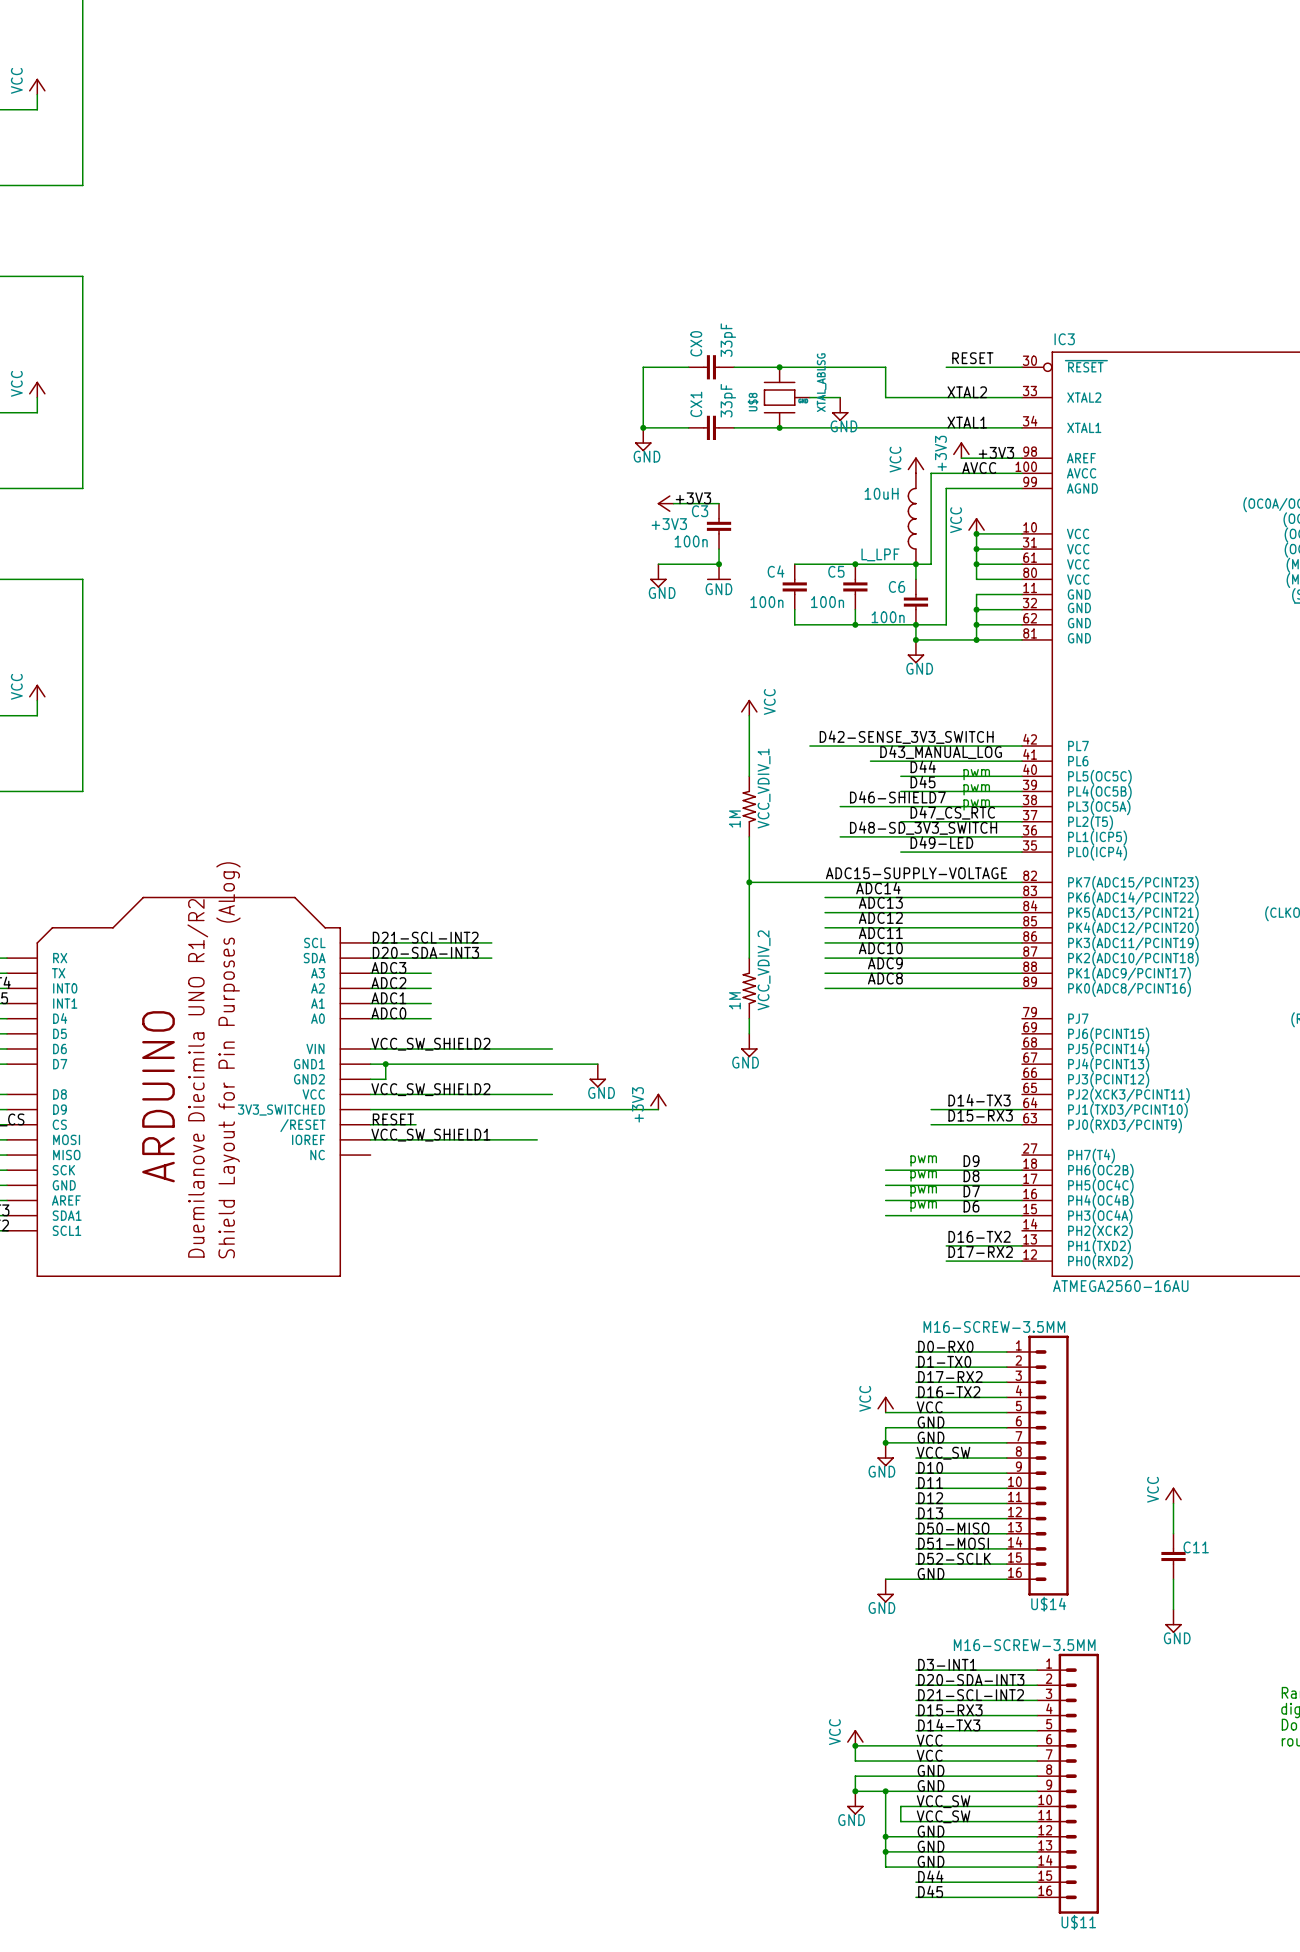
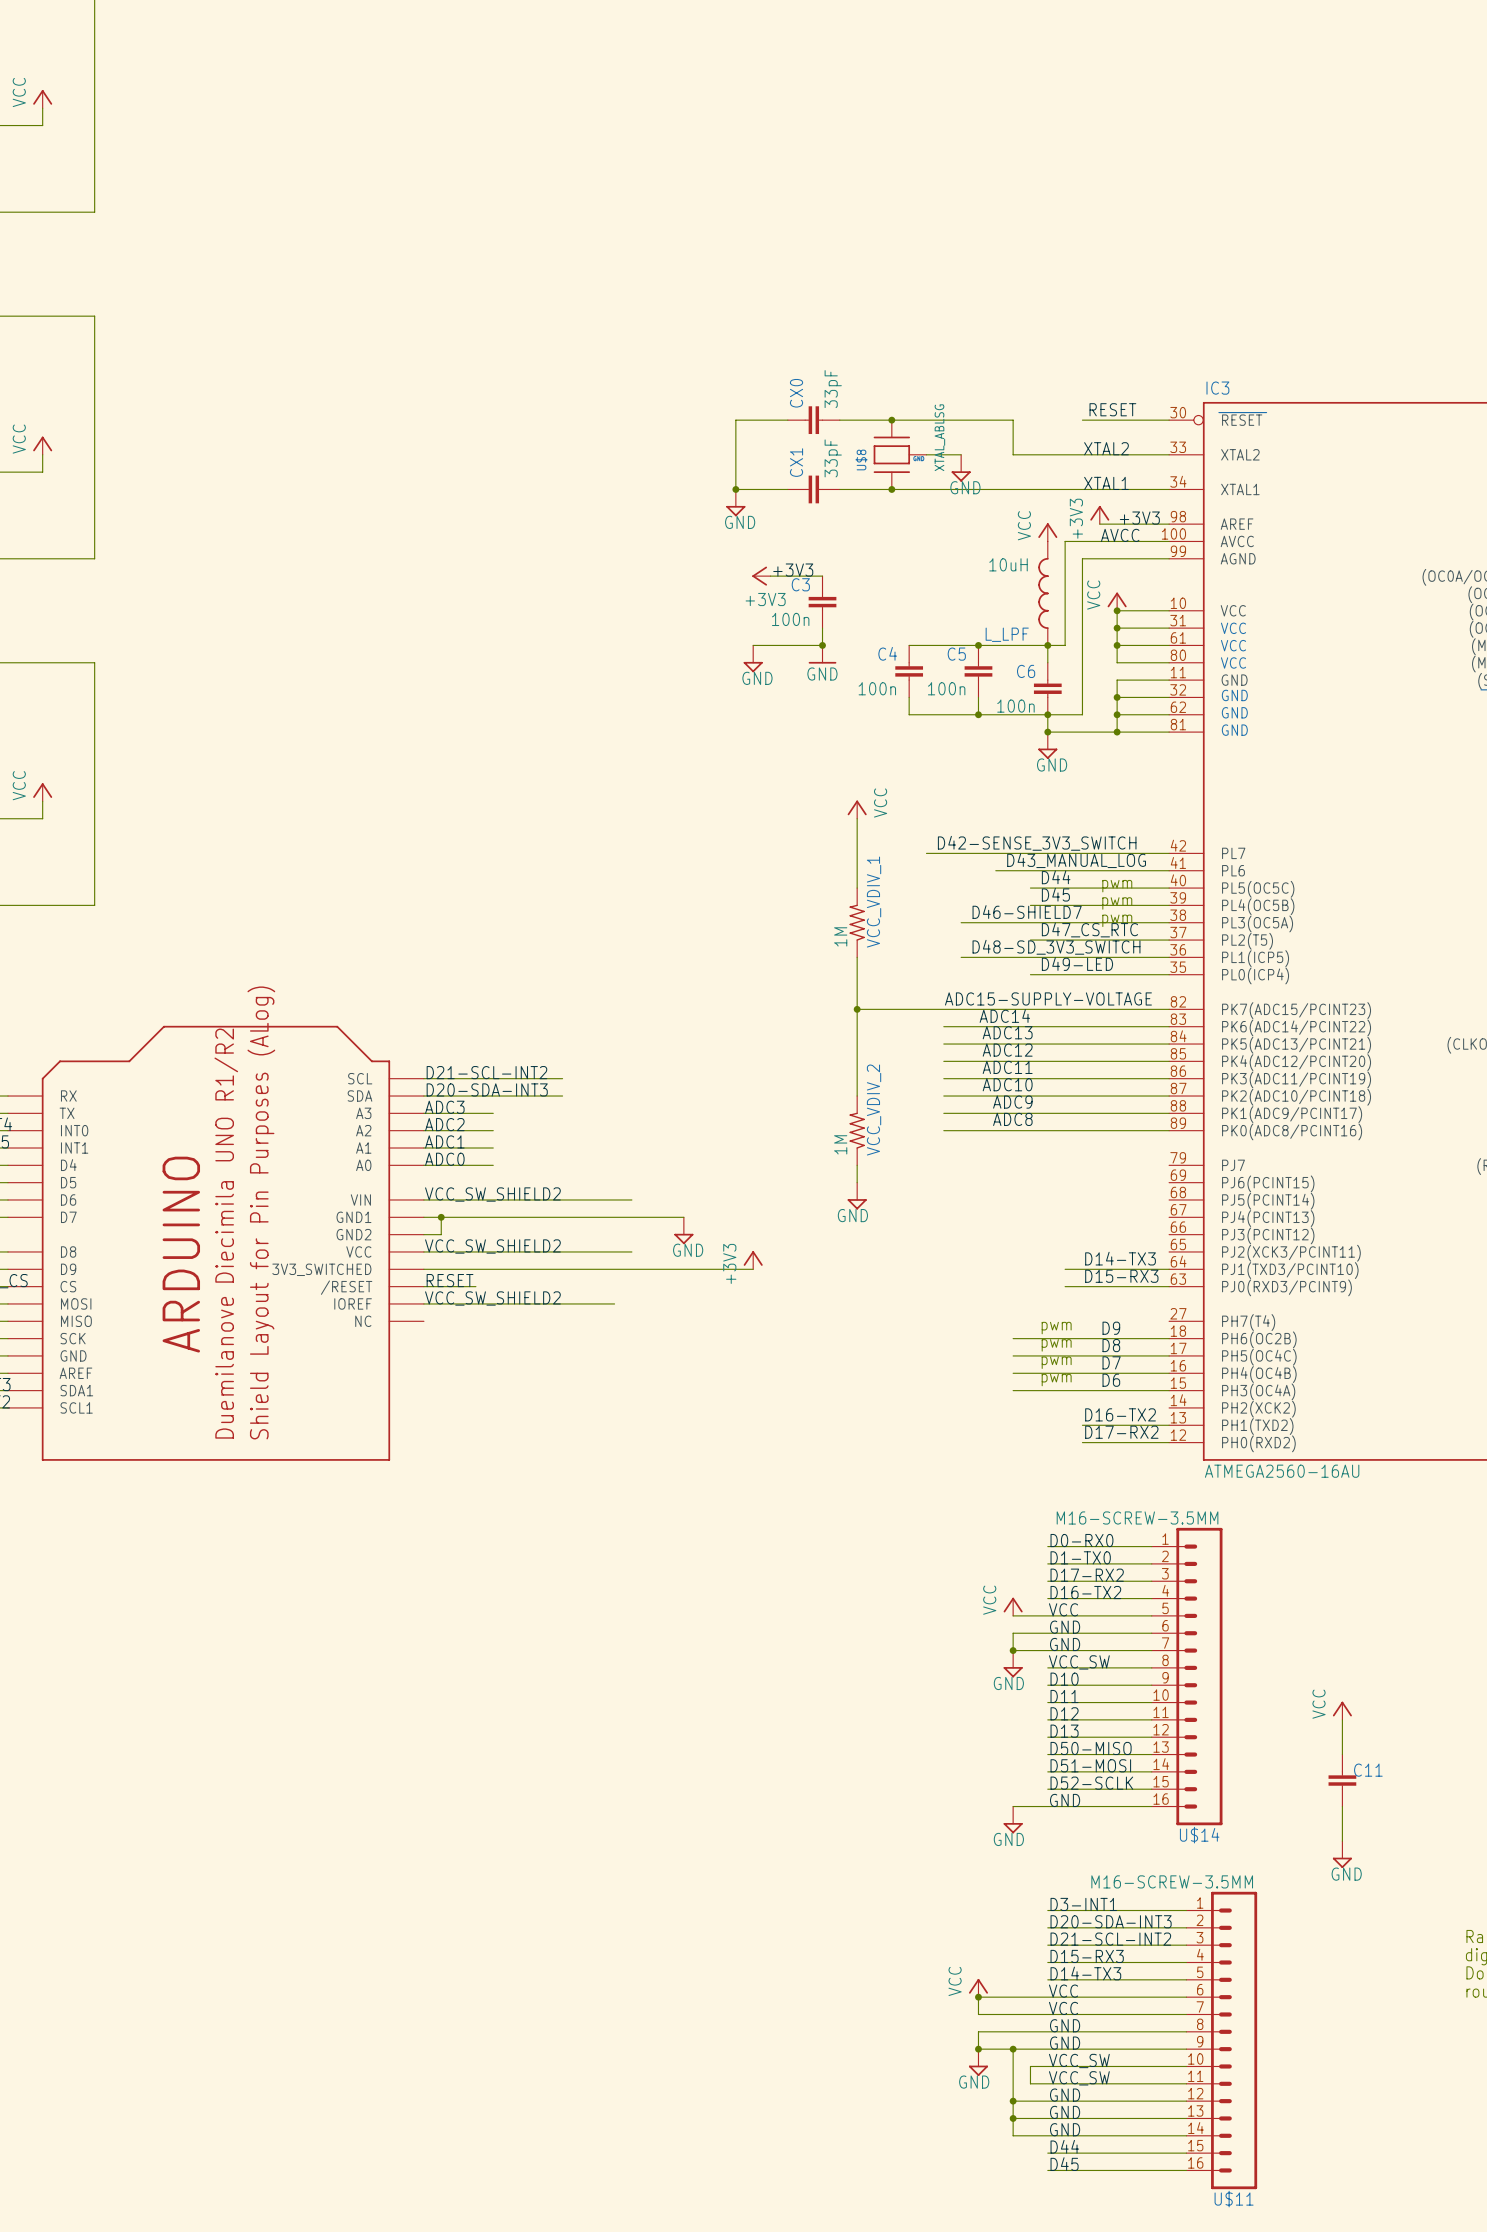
label: VCC_SW_SHIELD1 (430, 1135) -> VCC_SW_SHIELD2 (492, 1298)

